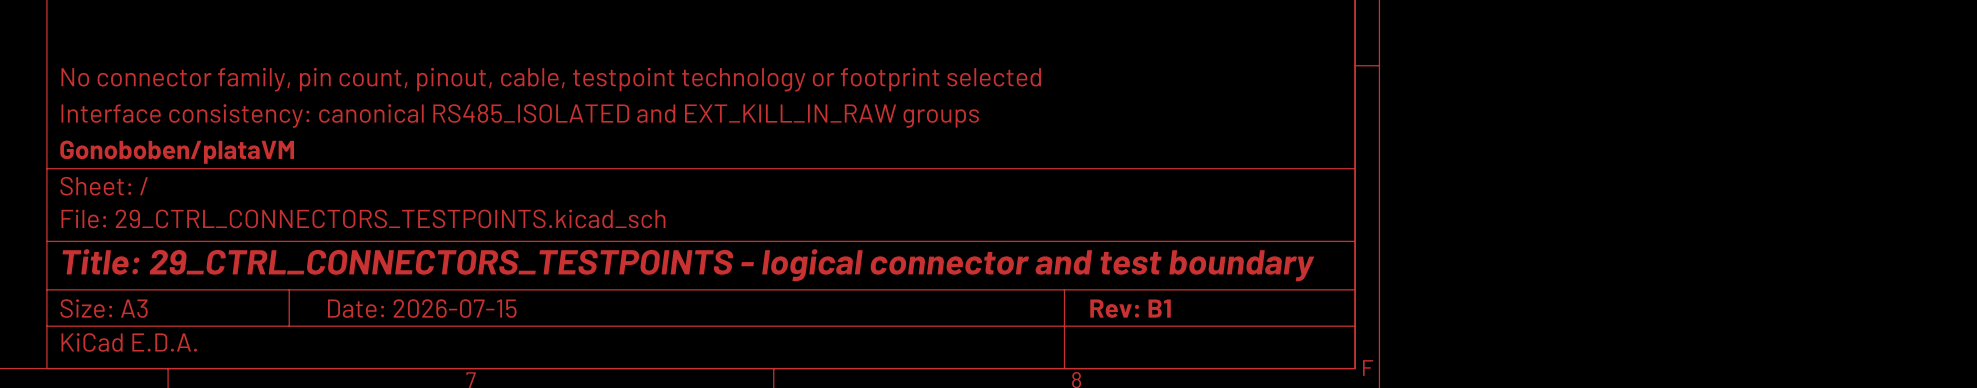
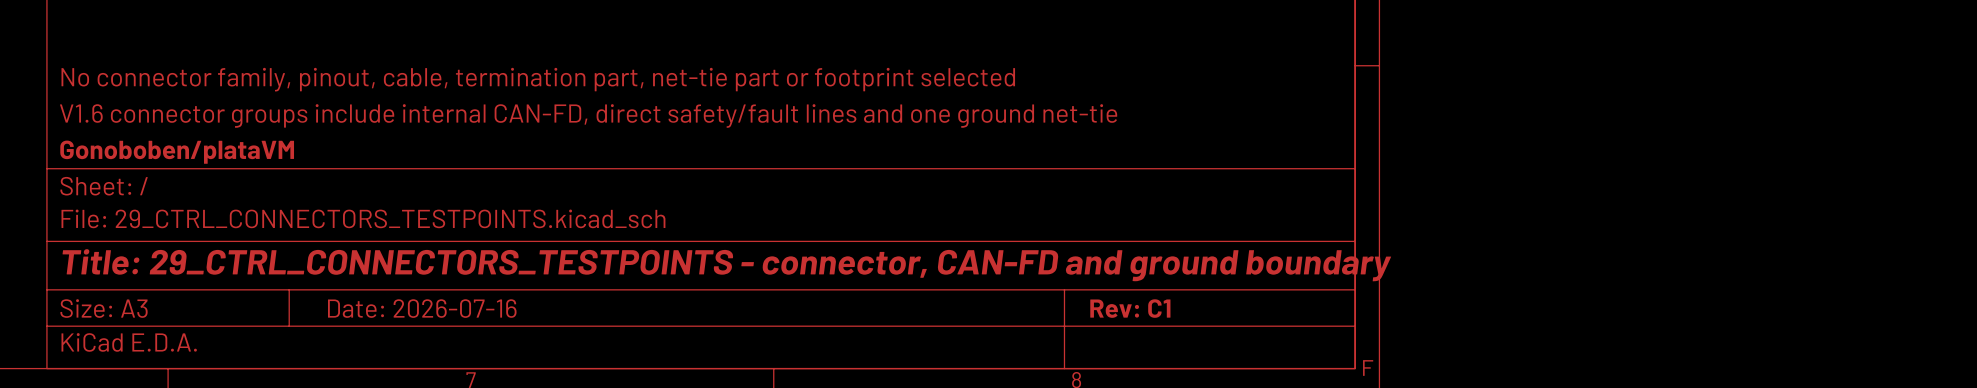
title block: No connector family, pin count, pinout, cable, testpoint technology or footprint selected (551, 79) -> No connector family, pinout, cable, termination part, net-tie part or footprint selected (538, 79)
title block: Interface consistency: canonical RS485_ISOLATED and EXT_KILL_IN_RAW groups (520, 115) -> V1.6 connector groups include internal CAN-FD, direct safety/fault lines and one ground net-tie (588, 115)
title block: Title: 29_CTRL_CONNECTORS_TESTPOINTS - logical connector and test boundary (688, 265) -> Title: 29_CTRL_CONNECTORS_TESTPOINTS - connector, CAN-FD and ground boundary (726, 265)
title block: Date: 2026-07-15 (422, 308) -> Date: 2026-07-16 (422, 308)
title block: Rev: B1 (1130, 308) -> Rev: C1 (1130, 308)

